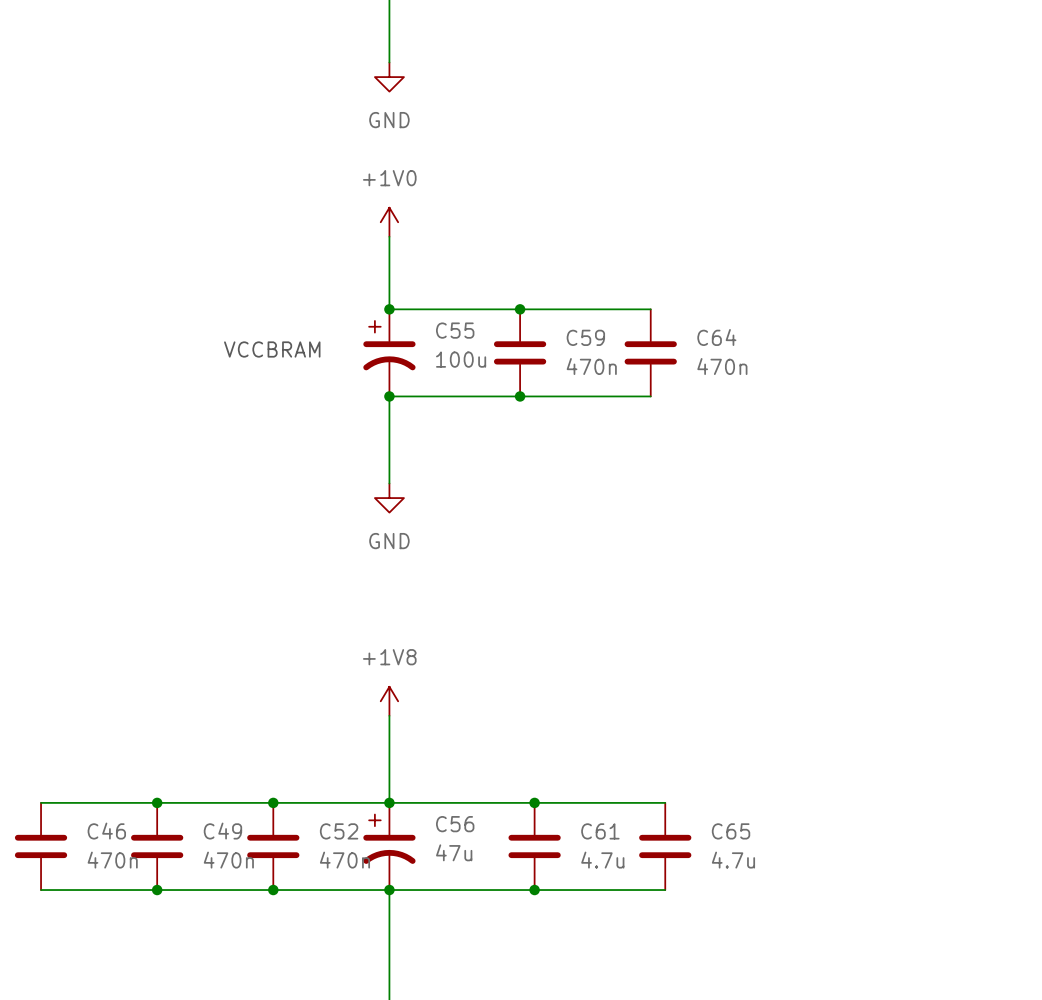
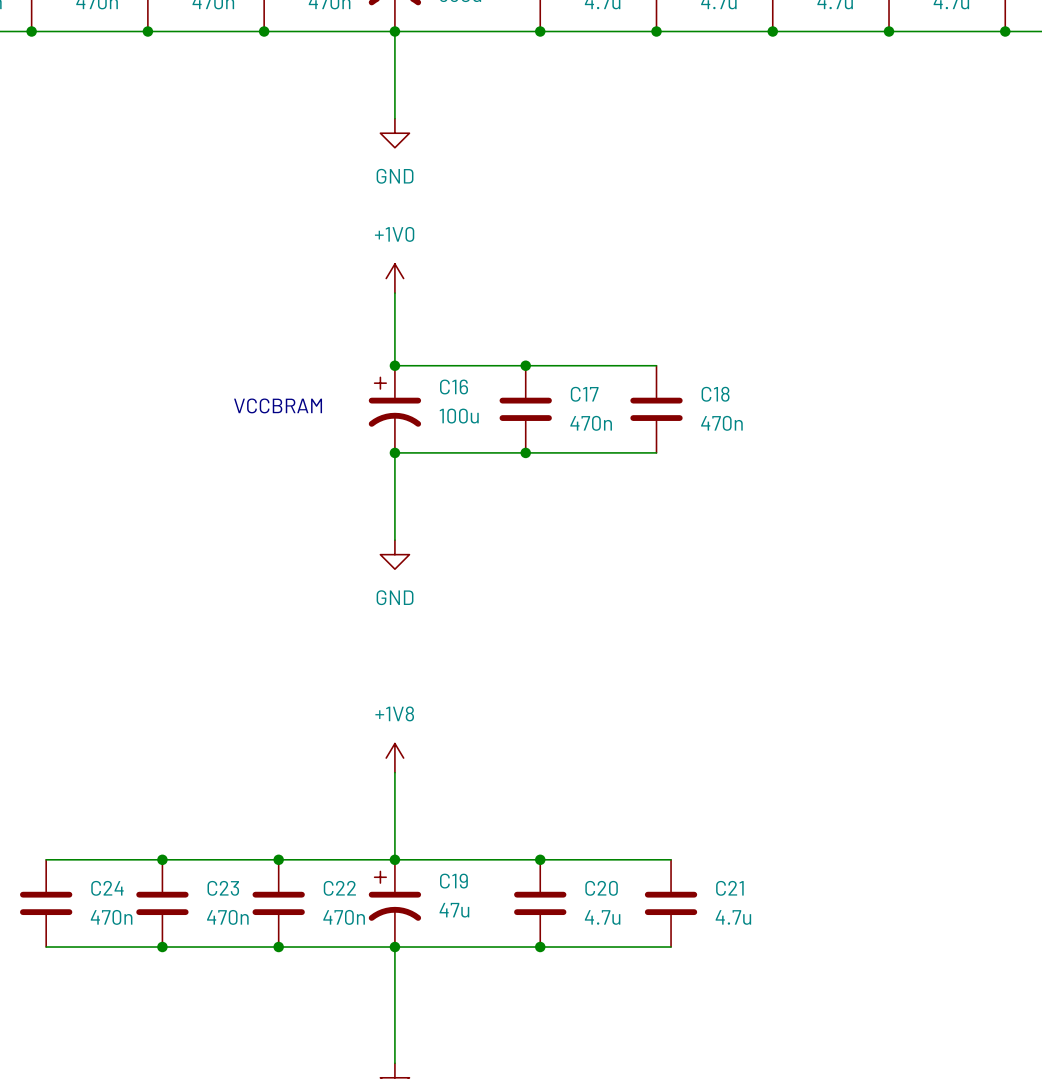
C55 name: C55 (455, 330) -> C16 (454, 387)
C59 name: C59 (585, 337) -> C17 (584, 394)
C64 name: C64 (716, 337) -> C18 (715, 394)
C56 name: C56 (455, 824) -> C19 (453, 881)
C46 name: C46 (106, 831) -> C24 (107, 888)
C49 name: C49 (222, 831) -> C23 (223, 888)
C52 name: C52 (339, 831) -> C22 (339, 888)
C61 name: C61 (600, 831) -> C20 (601, 888)
C65 name: C65 (731, 831) -> C21 (729, 888)

